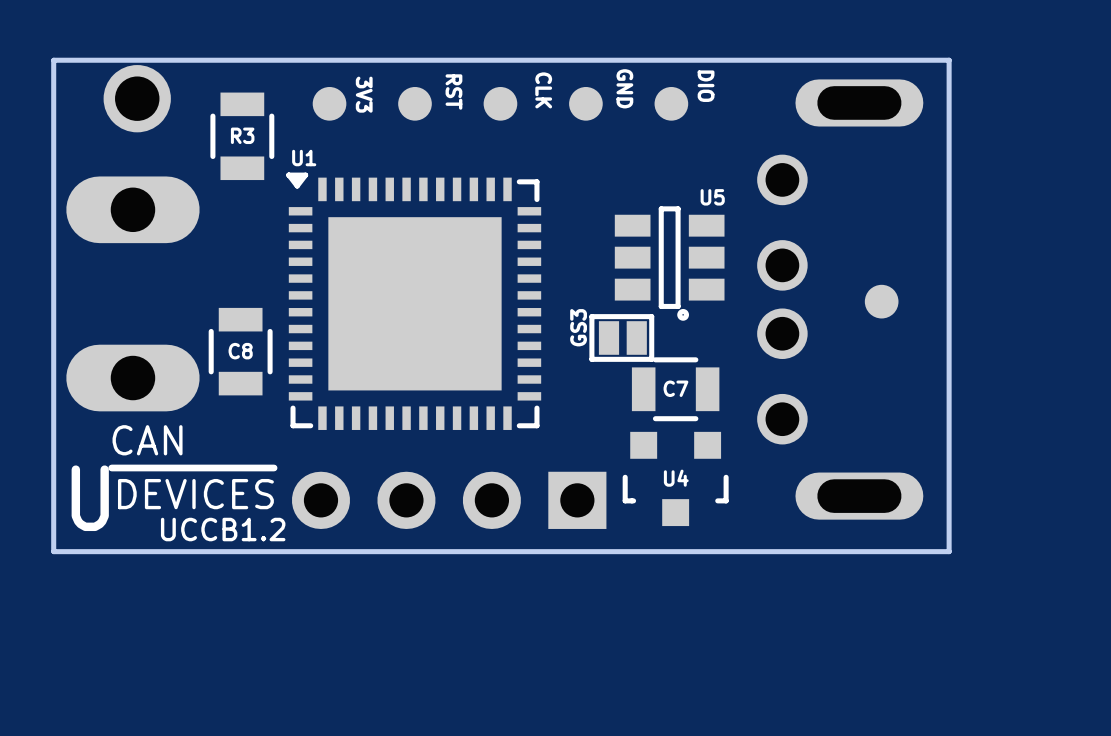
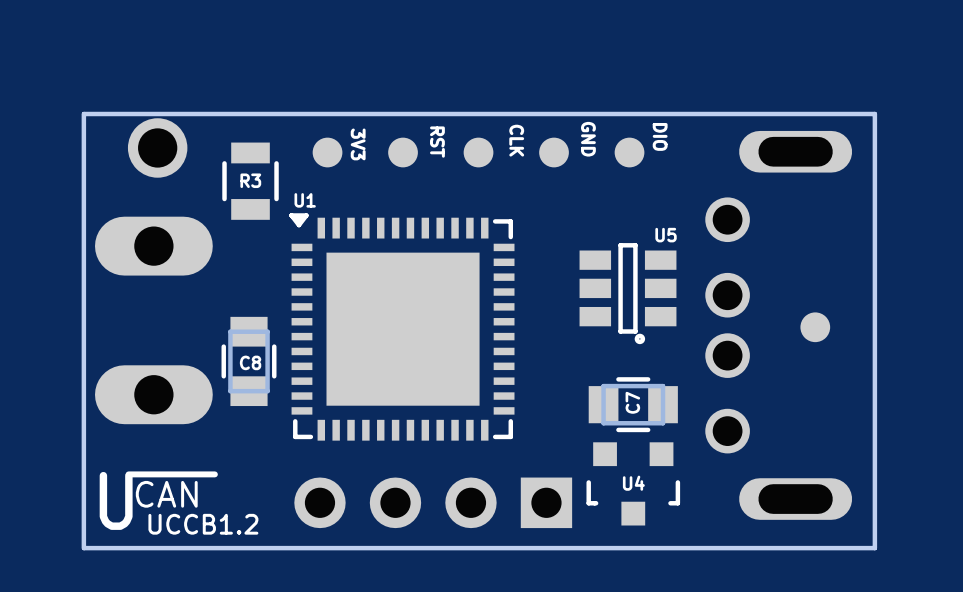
C8 footprint: [208, 307, 273, 396] -> [221, 316, 277, 407]
GS3: (621, 337) -> none
C7 footprint: [631, 357, 720, 422] -> [588, 377, 678, 433]
text position: CAN (147, 440) -> CAN (166, 494)
line: none -> (128, 474) (214, 474)
line: (111, 468) (274, 468) -> none
text: DEVICES (195, 494) -> none
text position: UCCB1.2 (223, 529) -> UCCB1.2 (203, 524)

